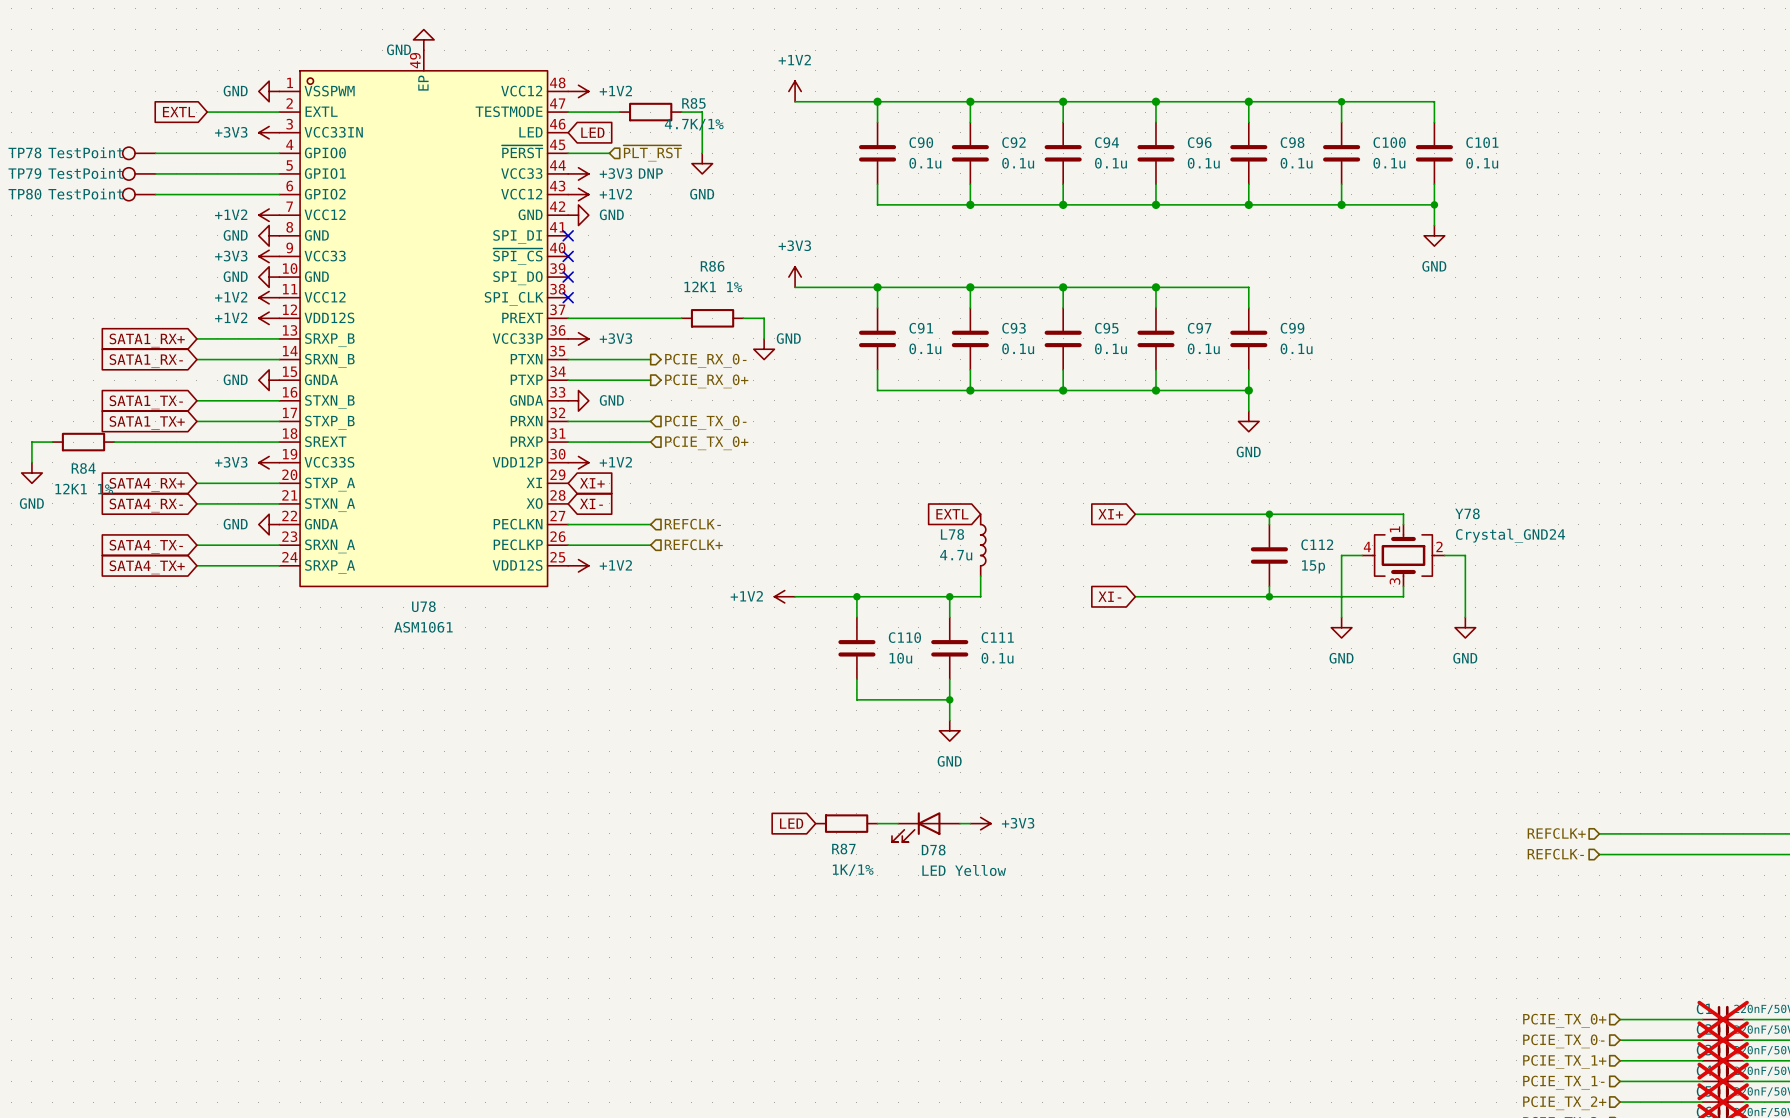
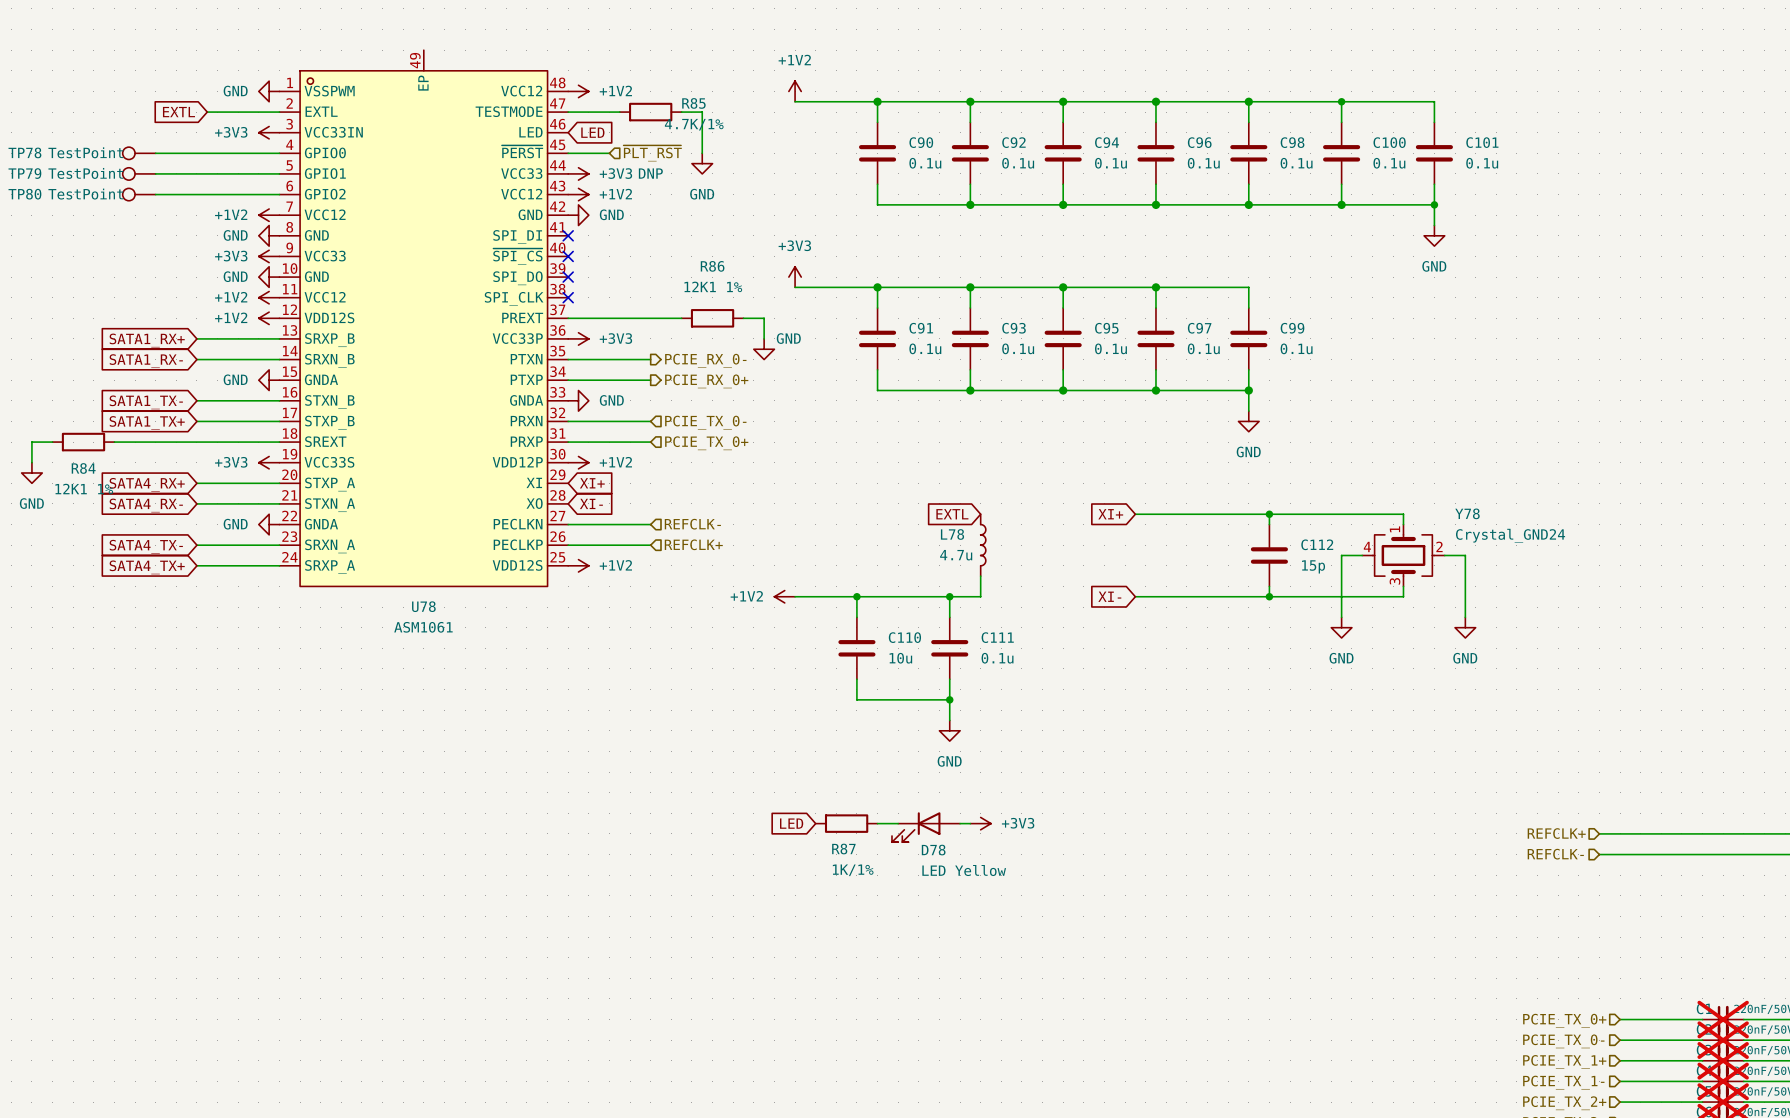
power symbol: GND (423, 39) -> none

